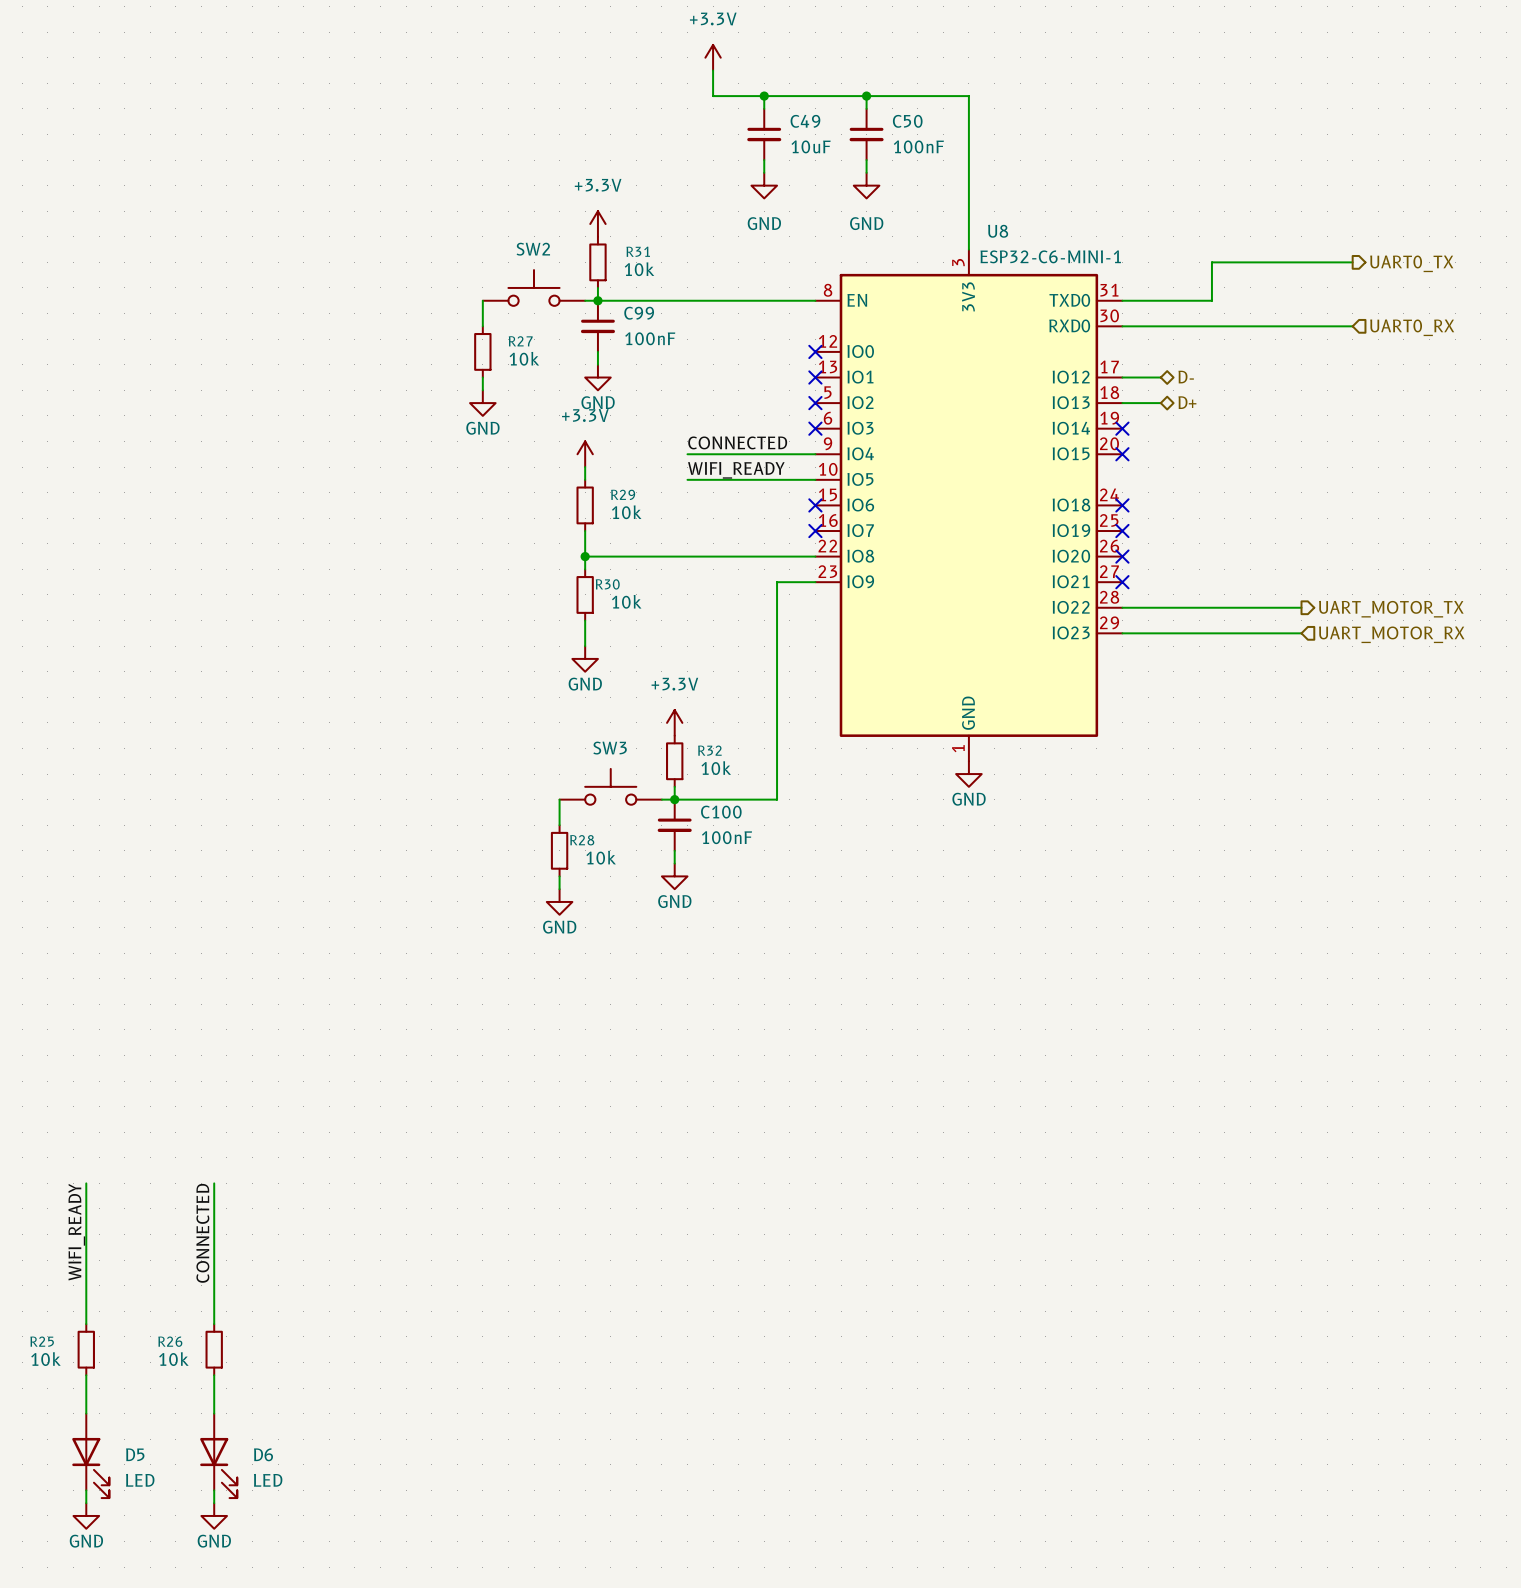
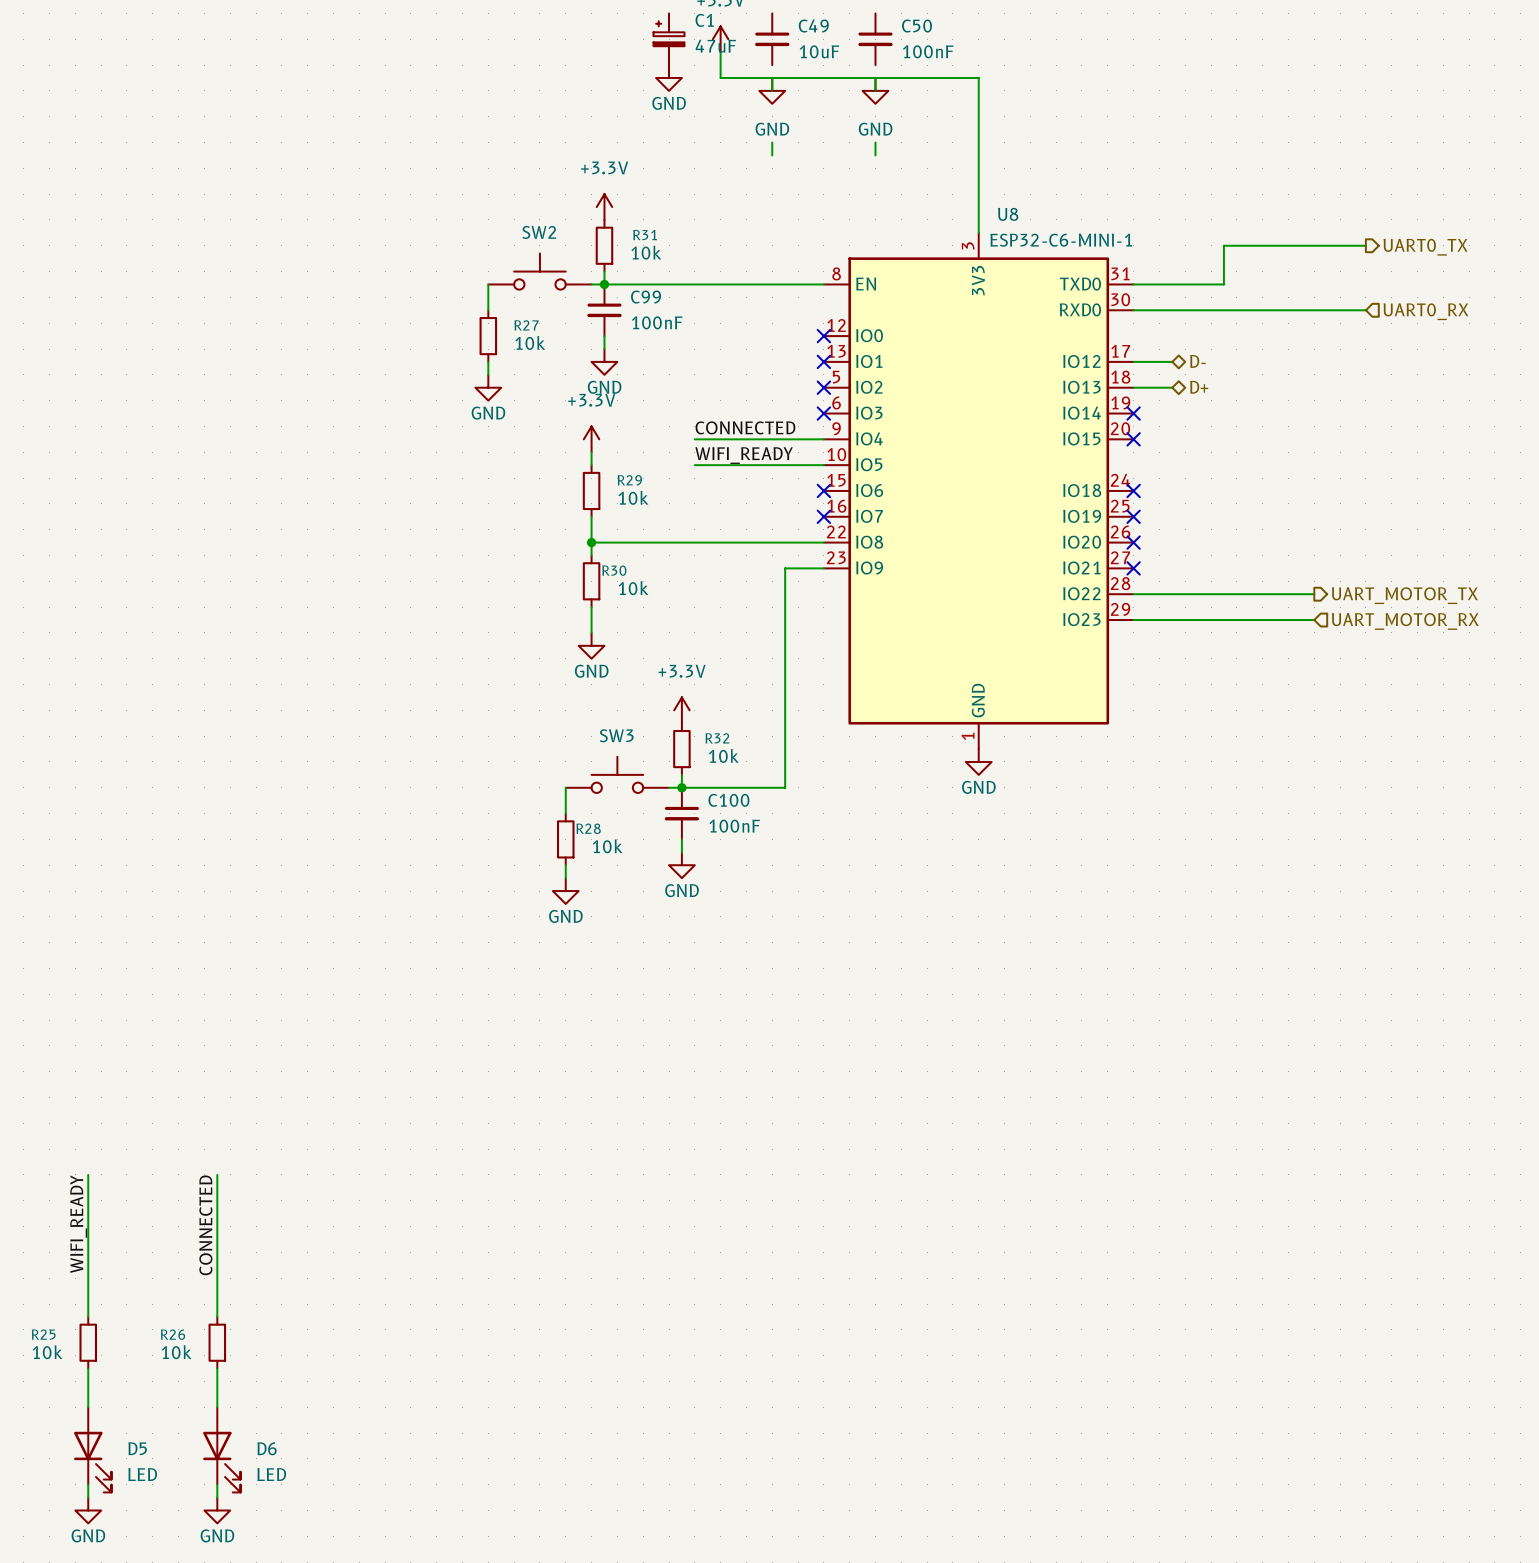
C1: none -> 47uF (669, 39)
power symbol: none -> GND (669, 77)
junction: (764, 96) -> none
junction: (866, 96) -> none
power symbol: none -> GND (772, 90)
power symbol: none -> GND (875, 90)
C49 position: (764, 134) -> (772, 39)
C50 position: (866, 134) -> (875, 39)
power symbol: GND (764, 185) -> none
power symbol: GND (866, 185) -> none

